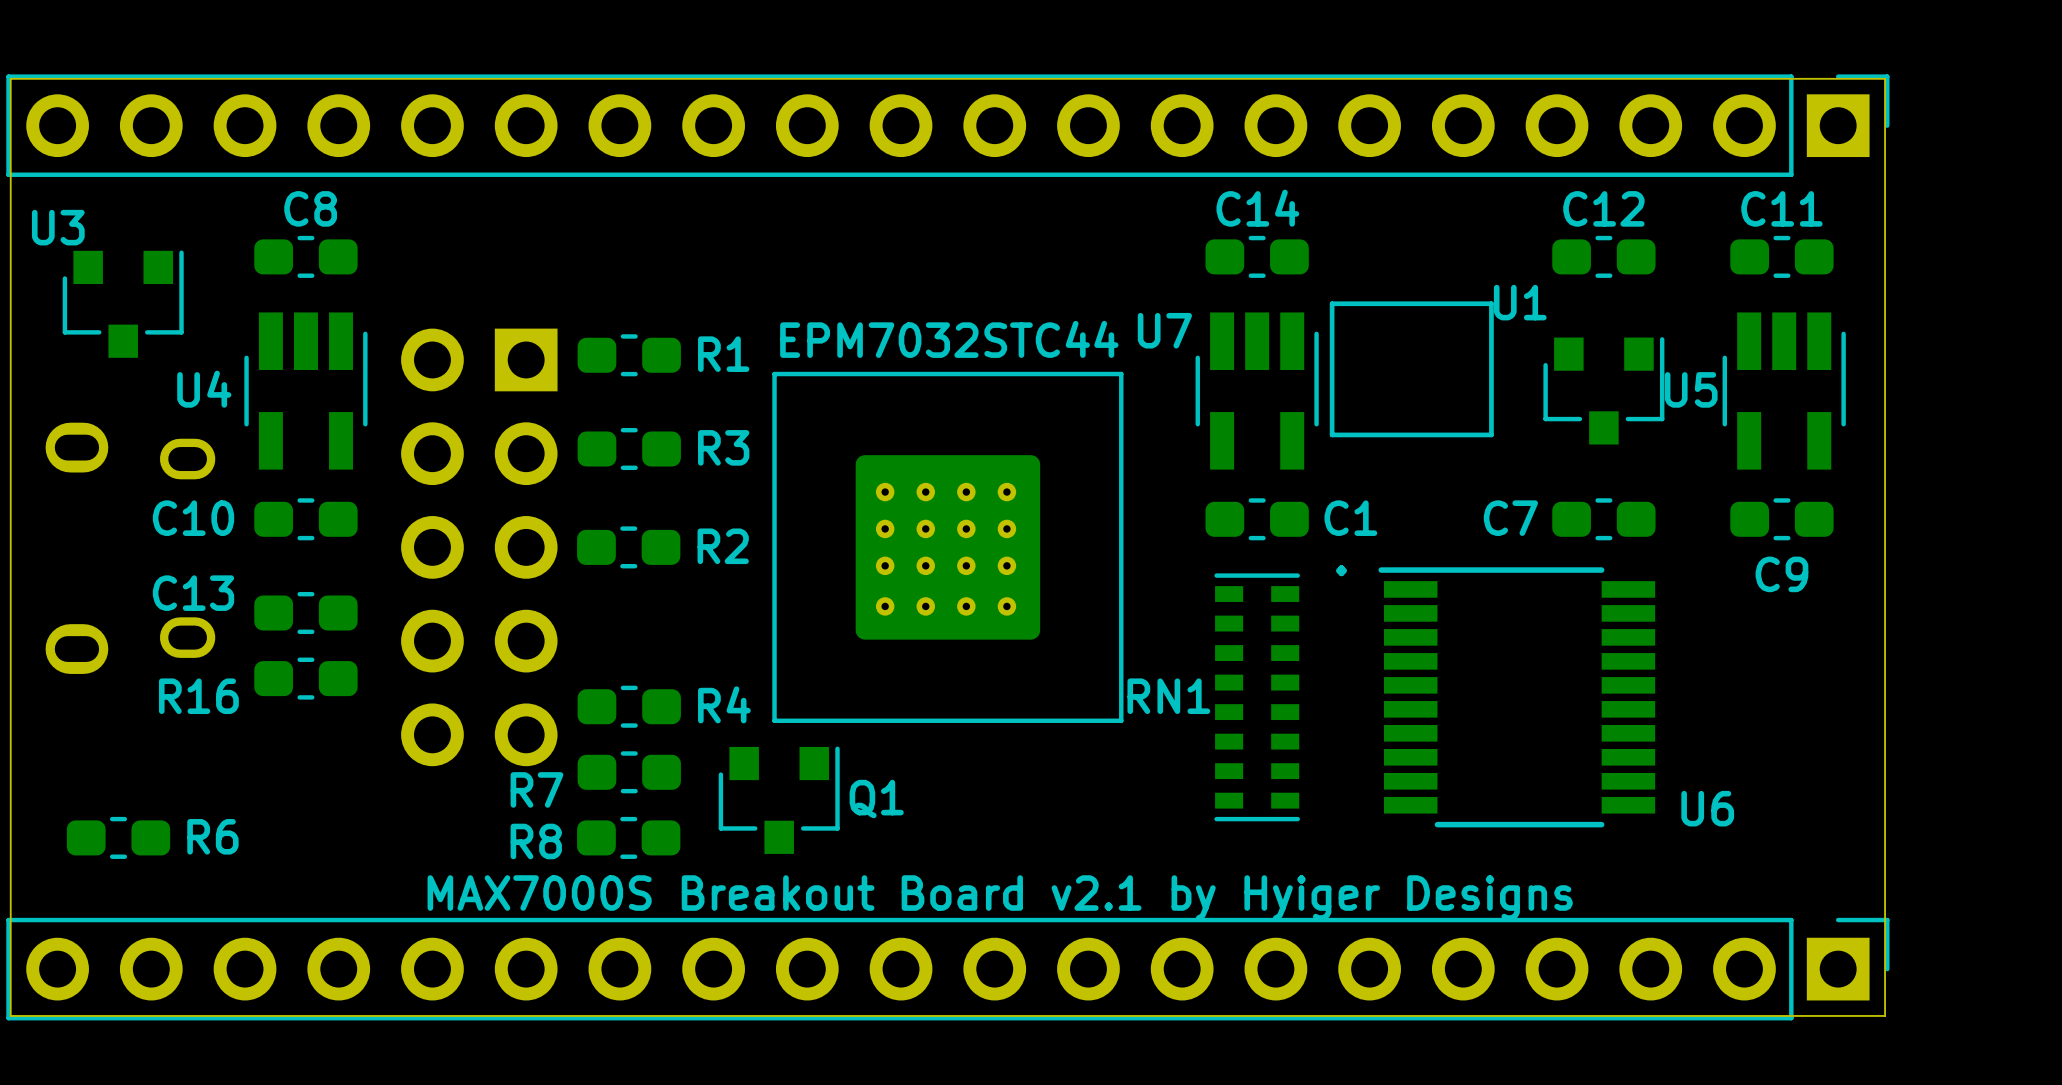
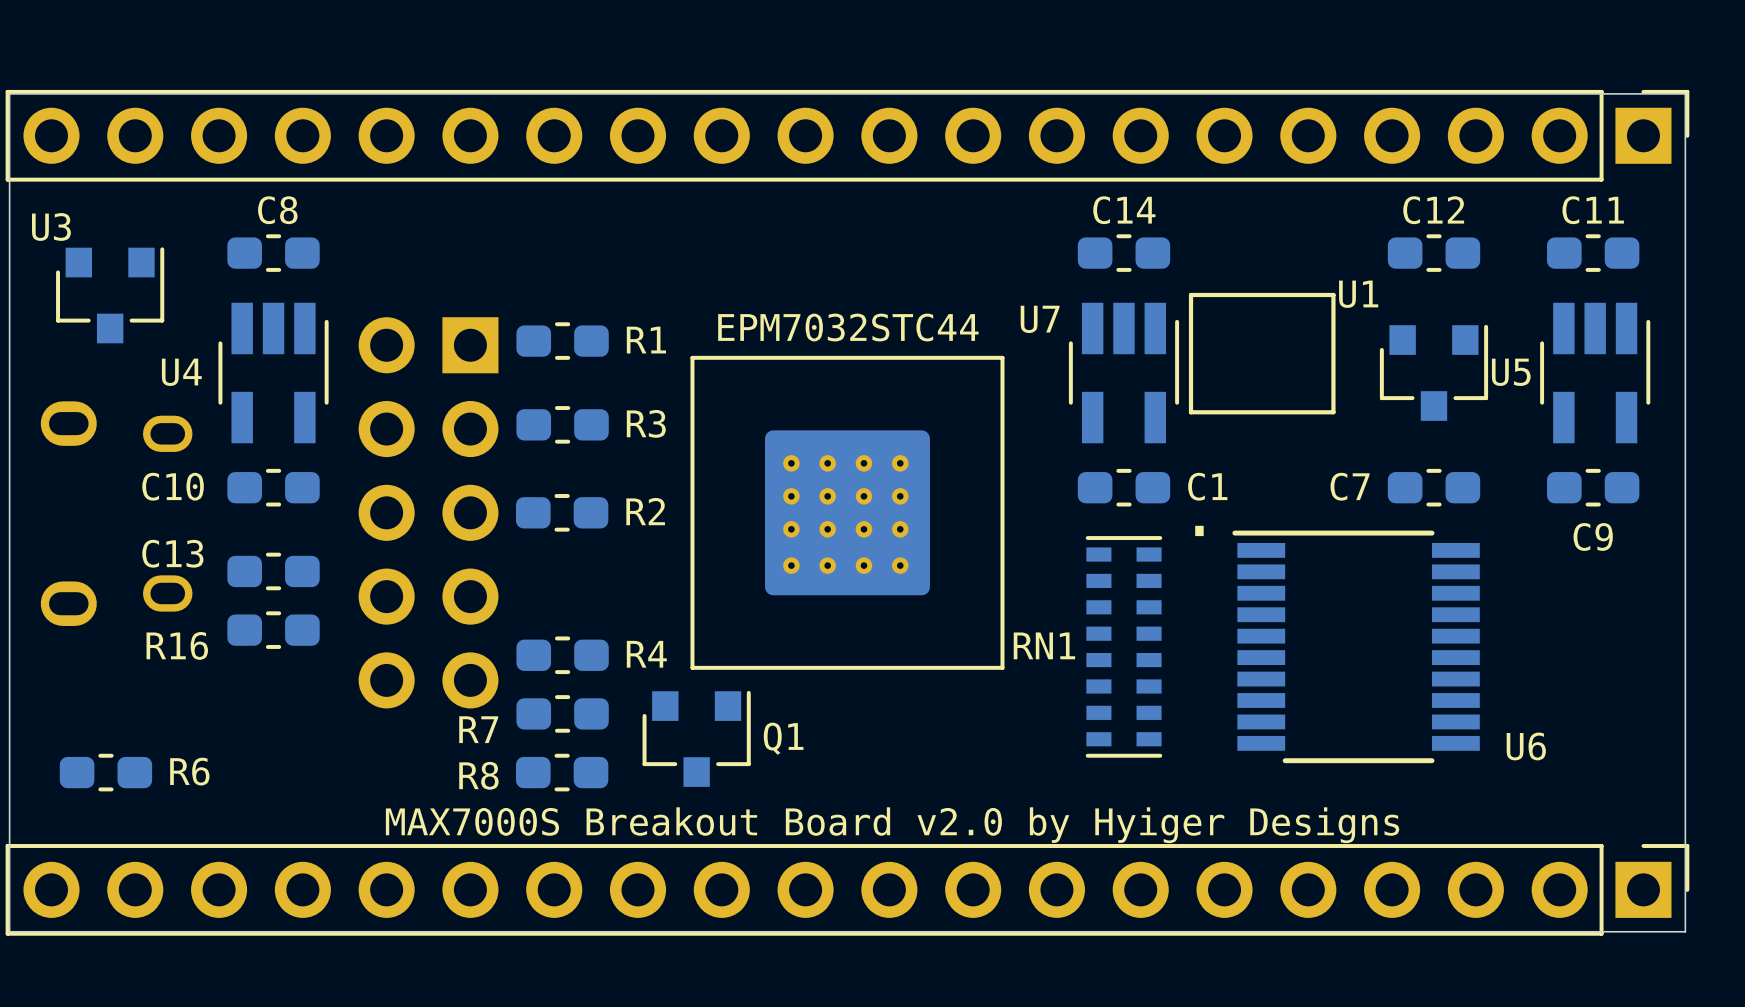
text: MAX7000S Breakout Board v2.1 by Hyiger Designs (1000, 898) -> MAX7000S Breakout Board v2.0 by Hyiger Designs (892, 825)

